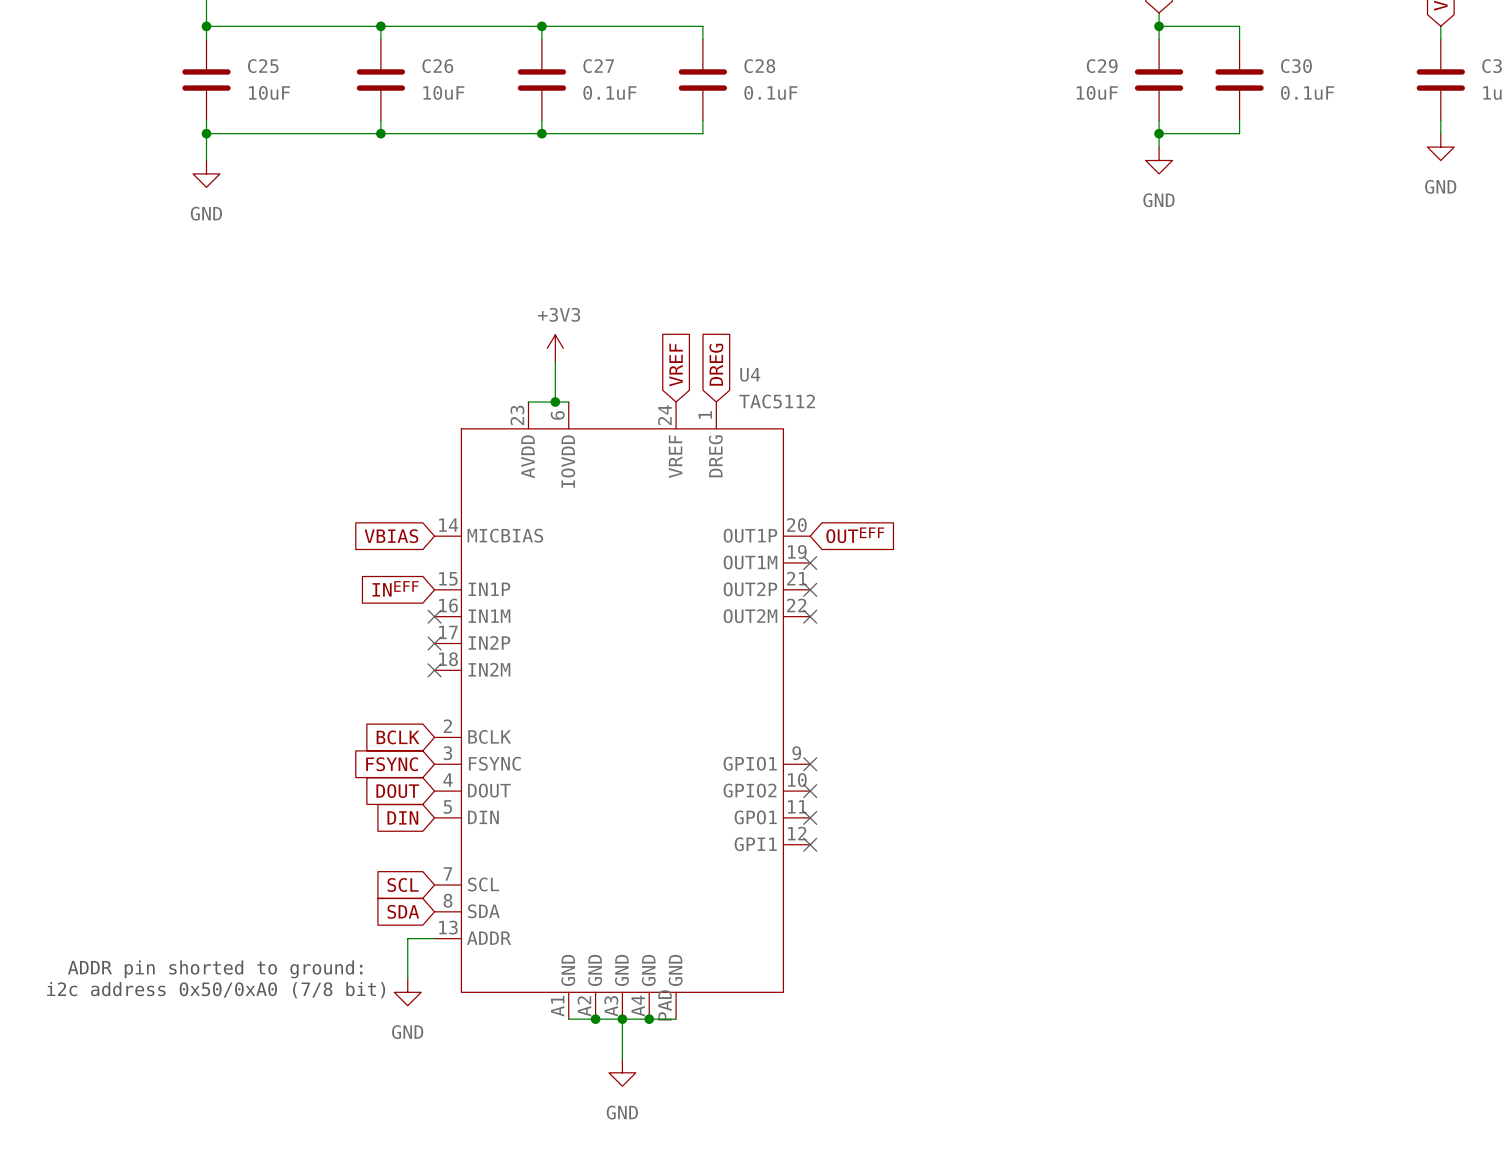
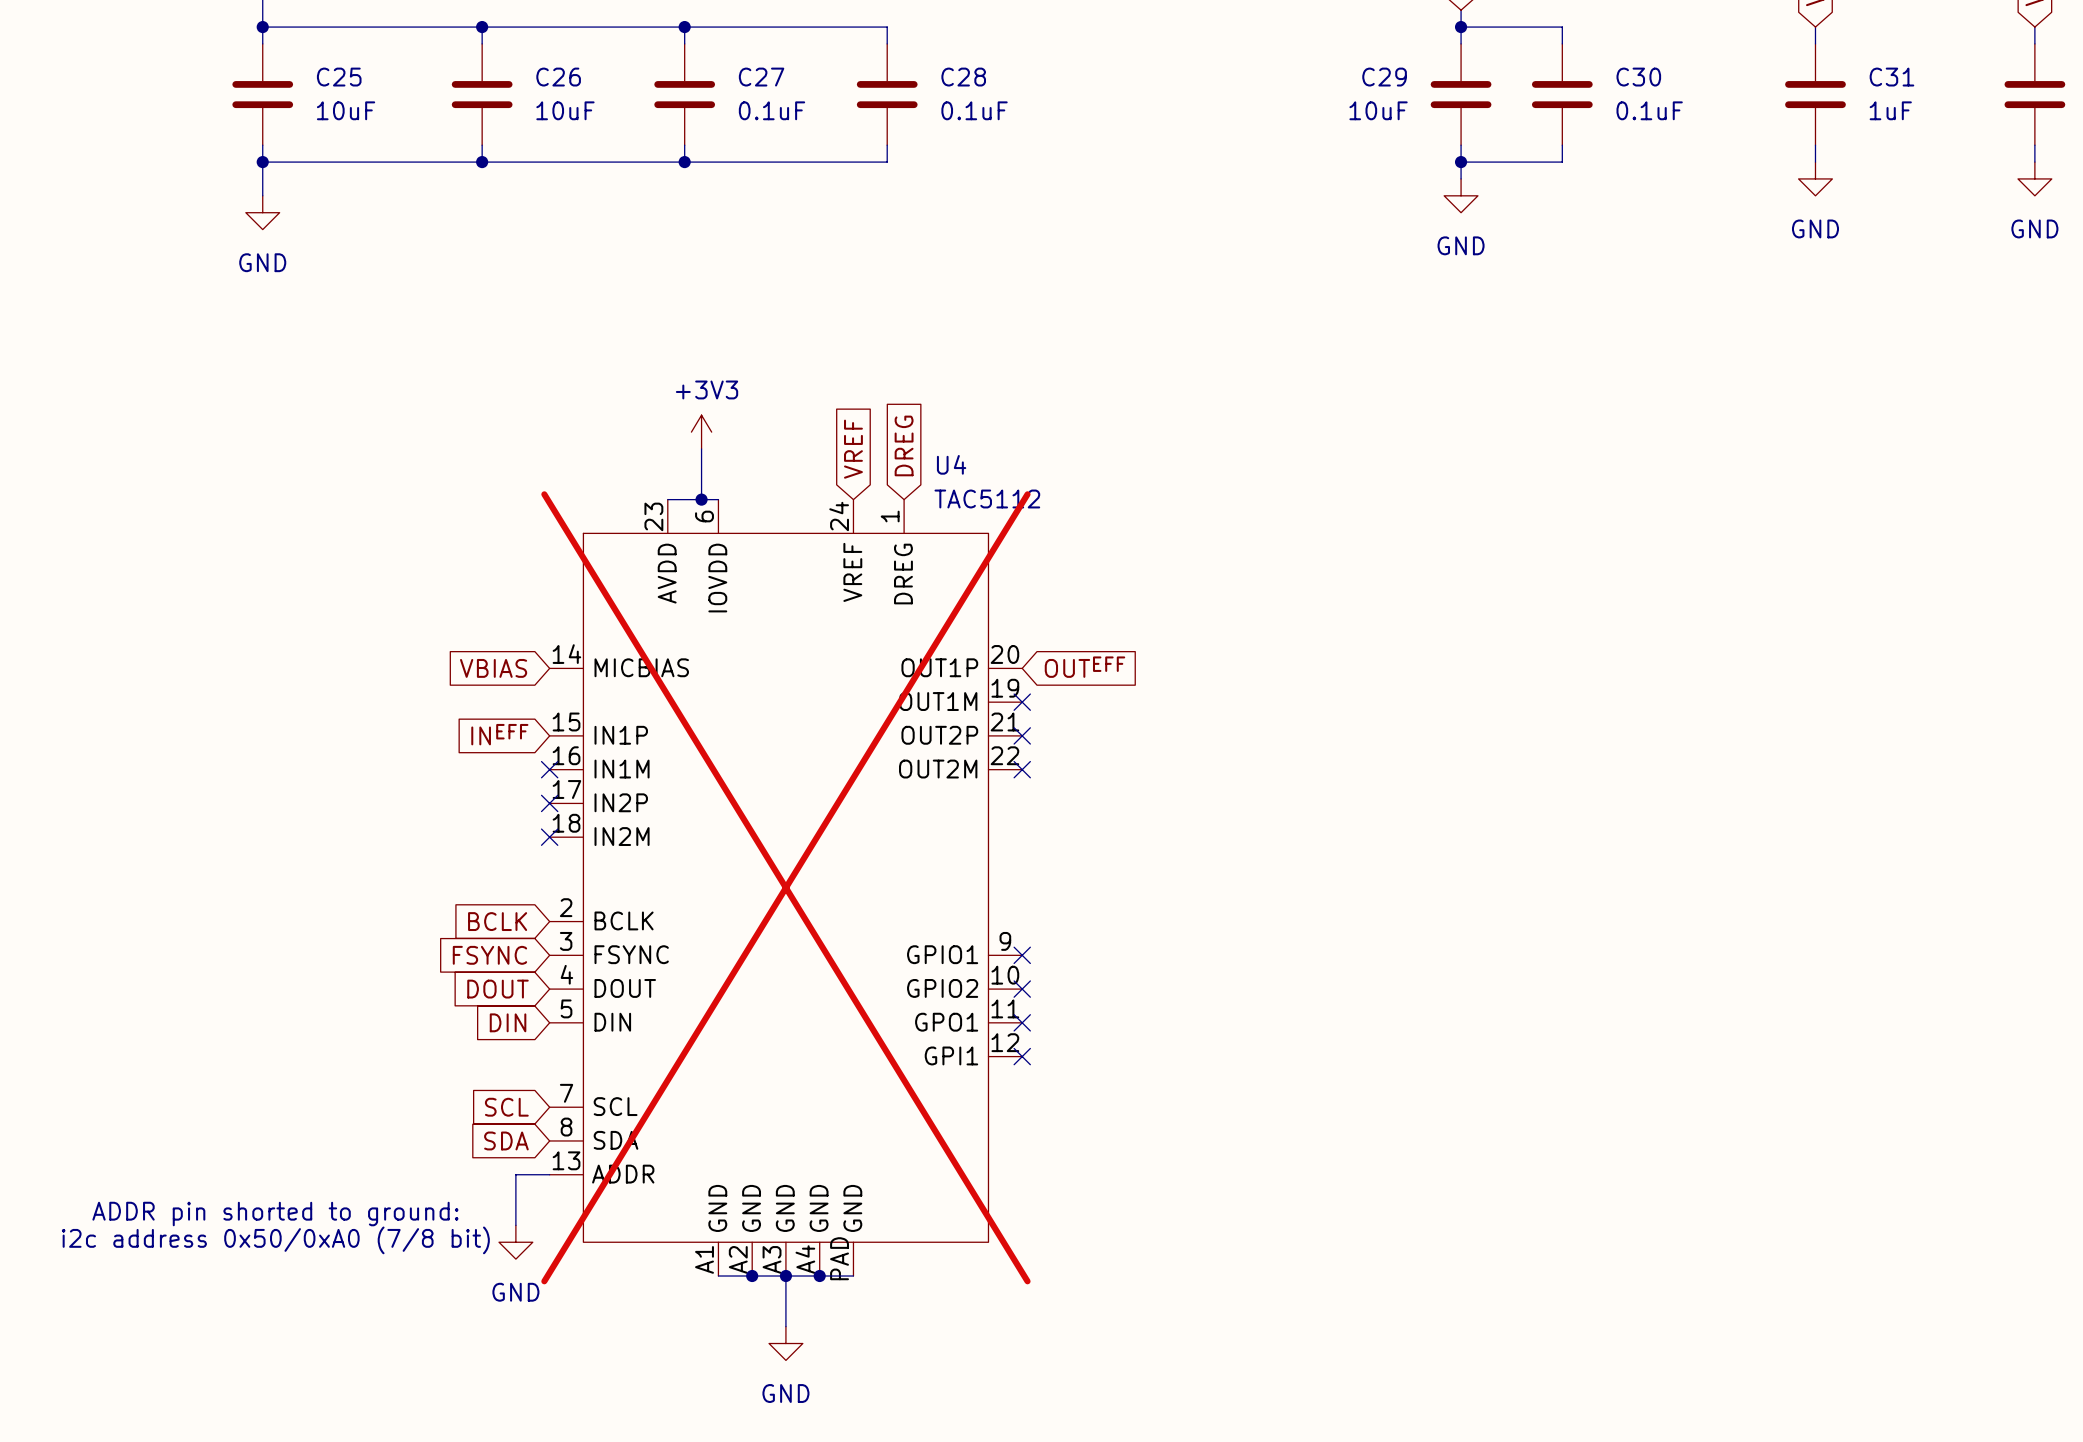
U4 do-not-place cross: none -> (785, 887)

